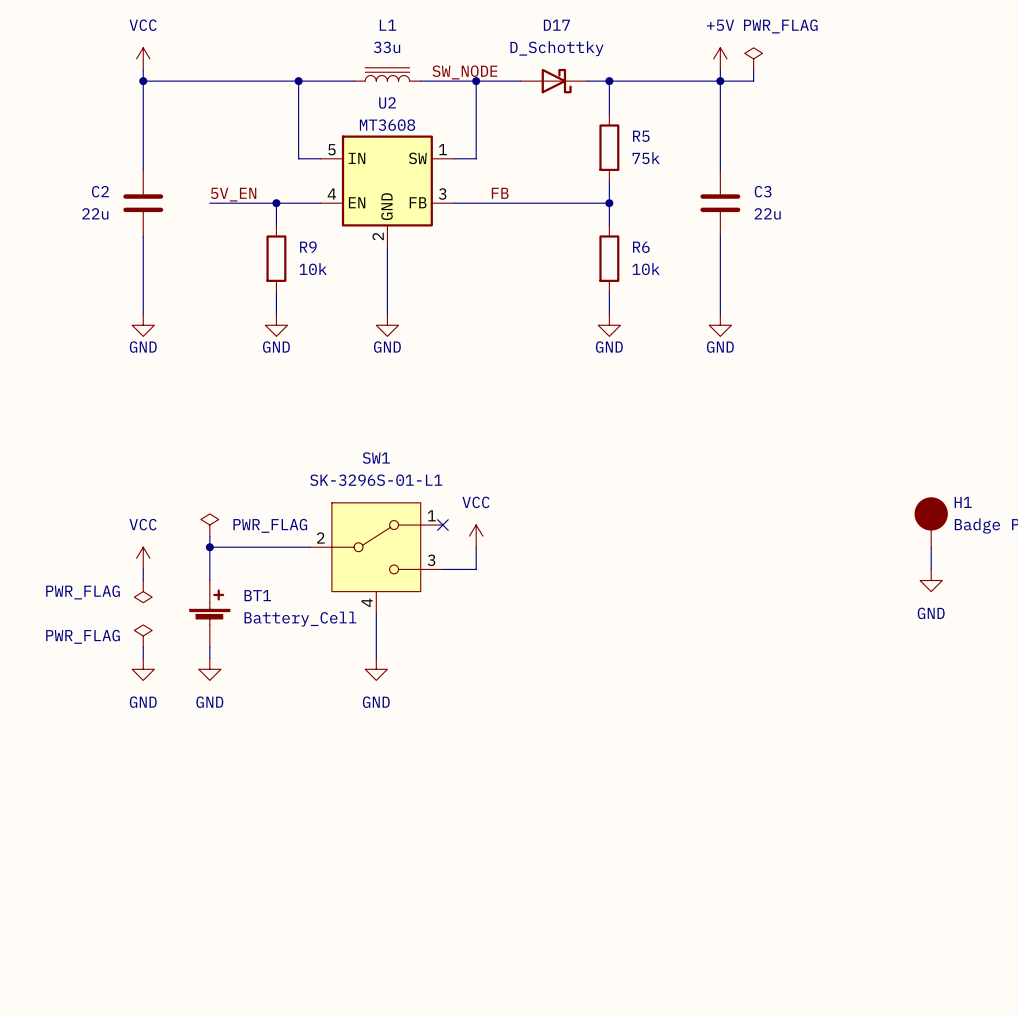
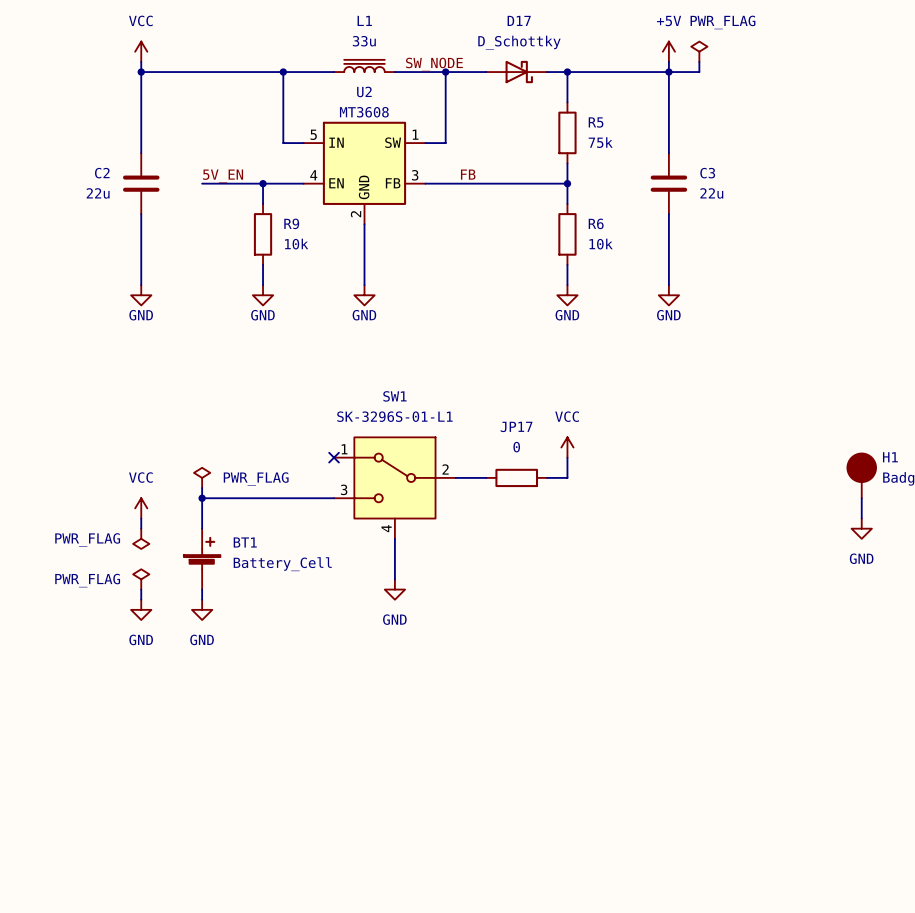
no-connect mark: none -> (334, 457)
wire: none -> (567, 457) (567, 477) (547, 477)
no-connect mark: (442, 525) -> none
wire: none -> (455, 477) (486, 477)
JP17: none -> 0 (516, 477)
power symbol position: VCC (476, 536) -> VCC (567, 447)
SW1 flip: as is (376, 547) -> left-right (394, 477)
wire: (476, 547) (476, 569) (442, 569) -> none
wire: (376, 613) (376, 658) -> (394, 538) (394, 579)
power symbol position: GND (376, 669) -> GND (394, 589)

